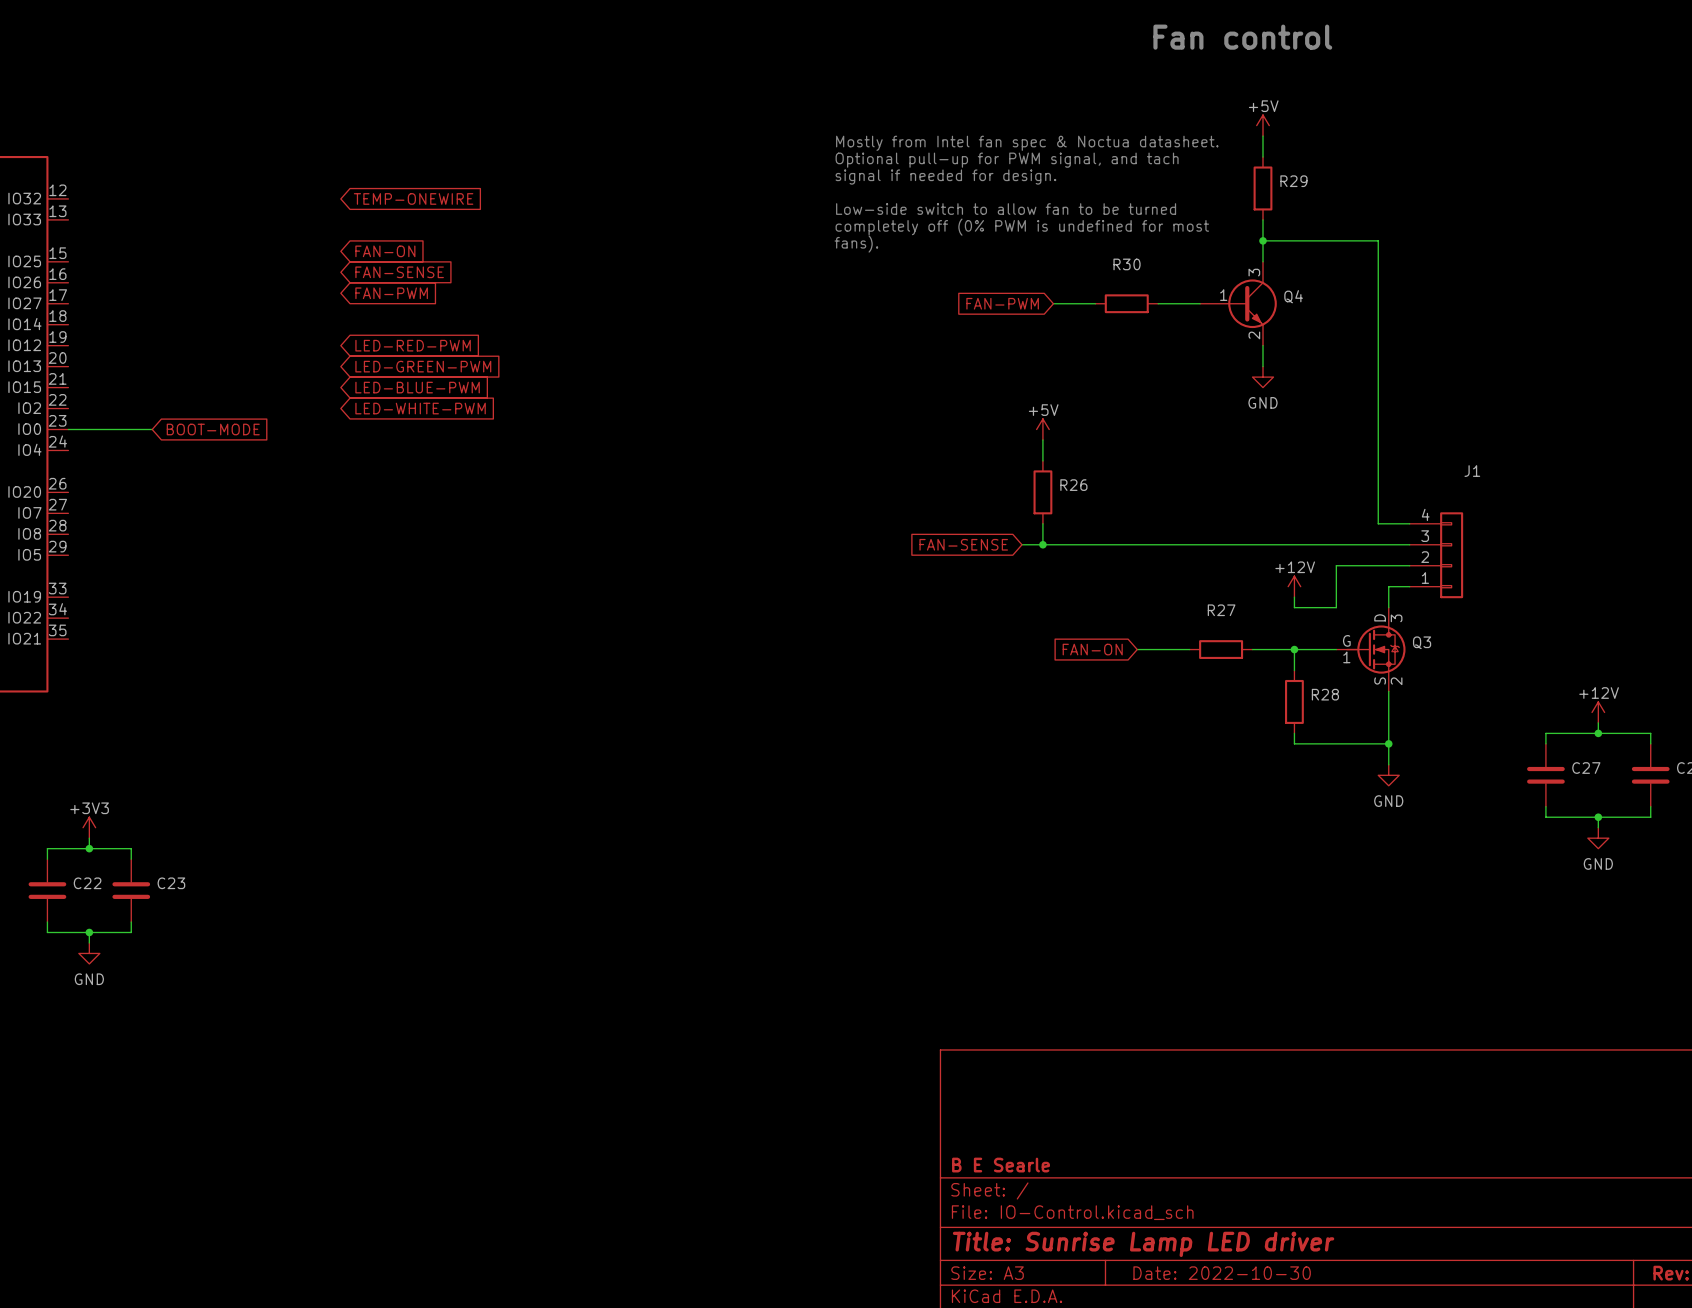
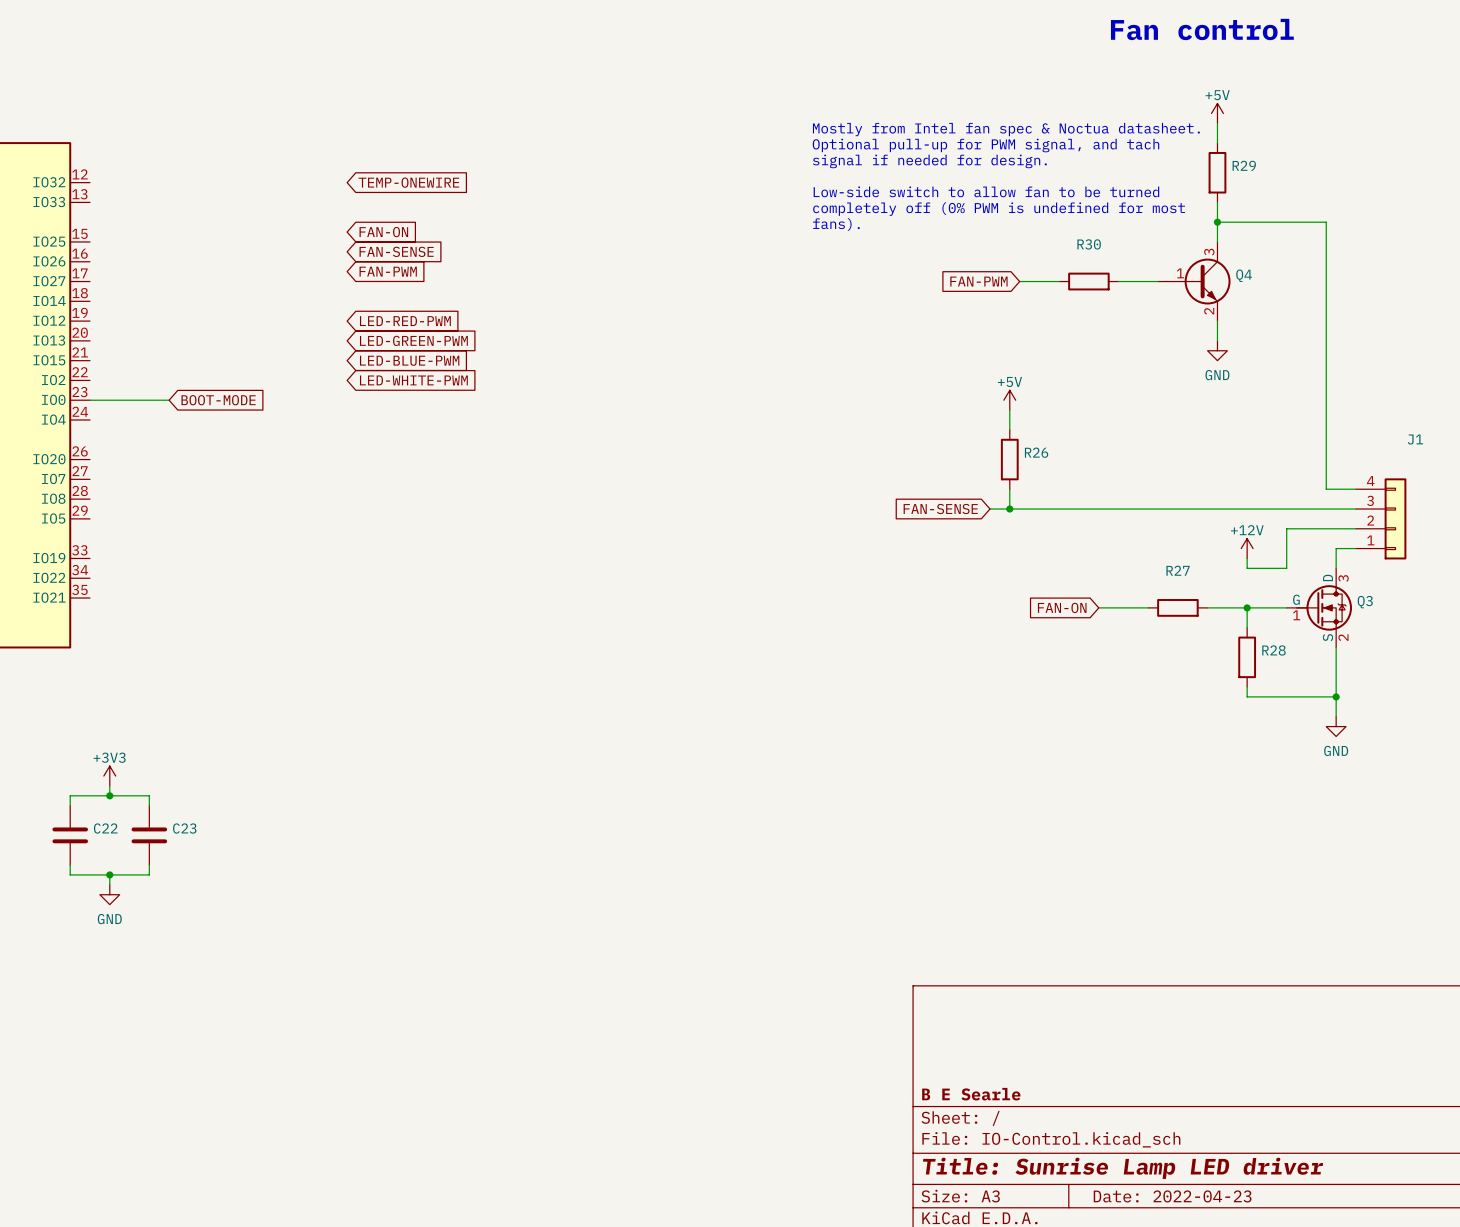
title block: Date: 2022-10-30 (1222, 1273) -> Date: 2022-04-23 (1172, 1196)

